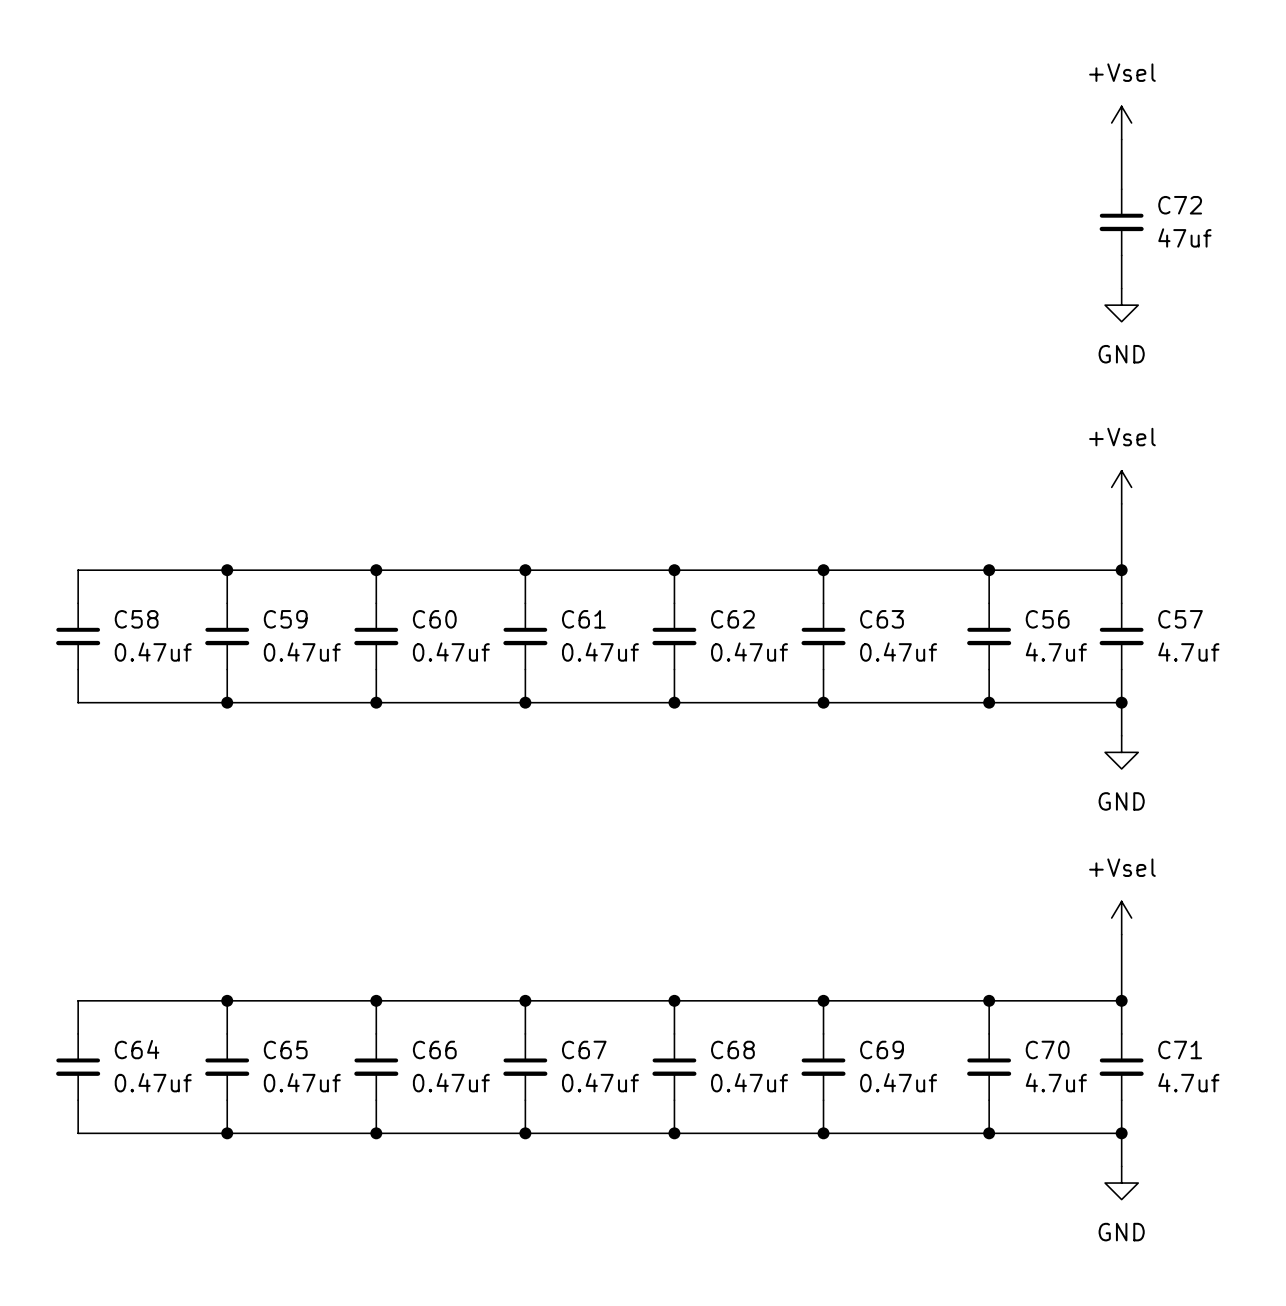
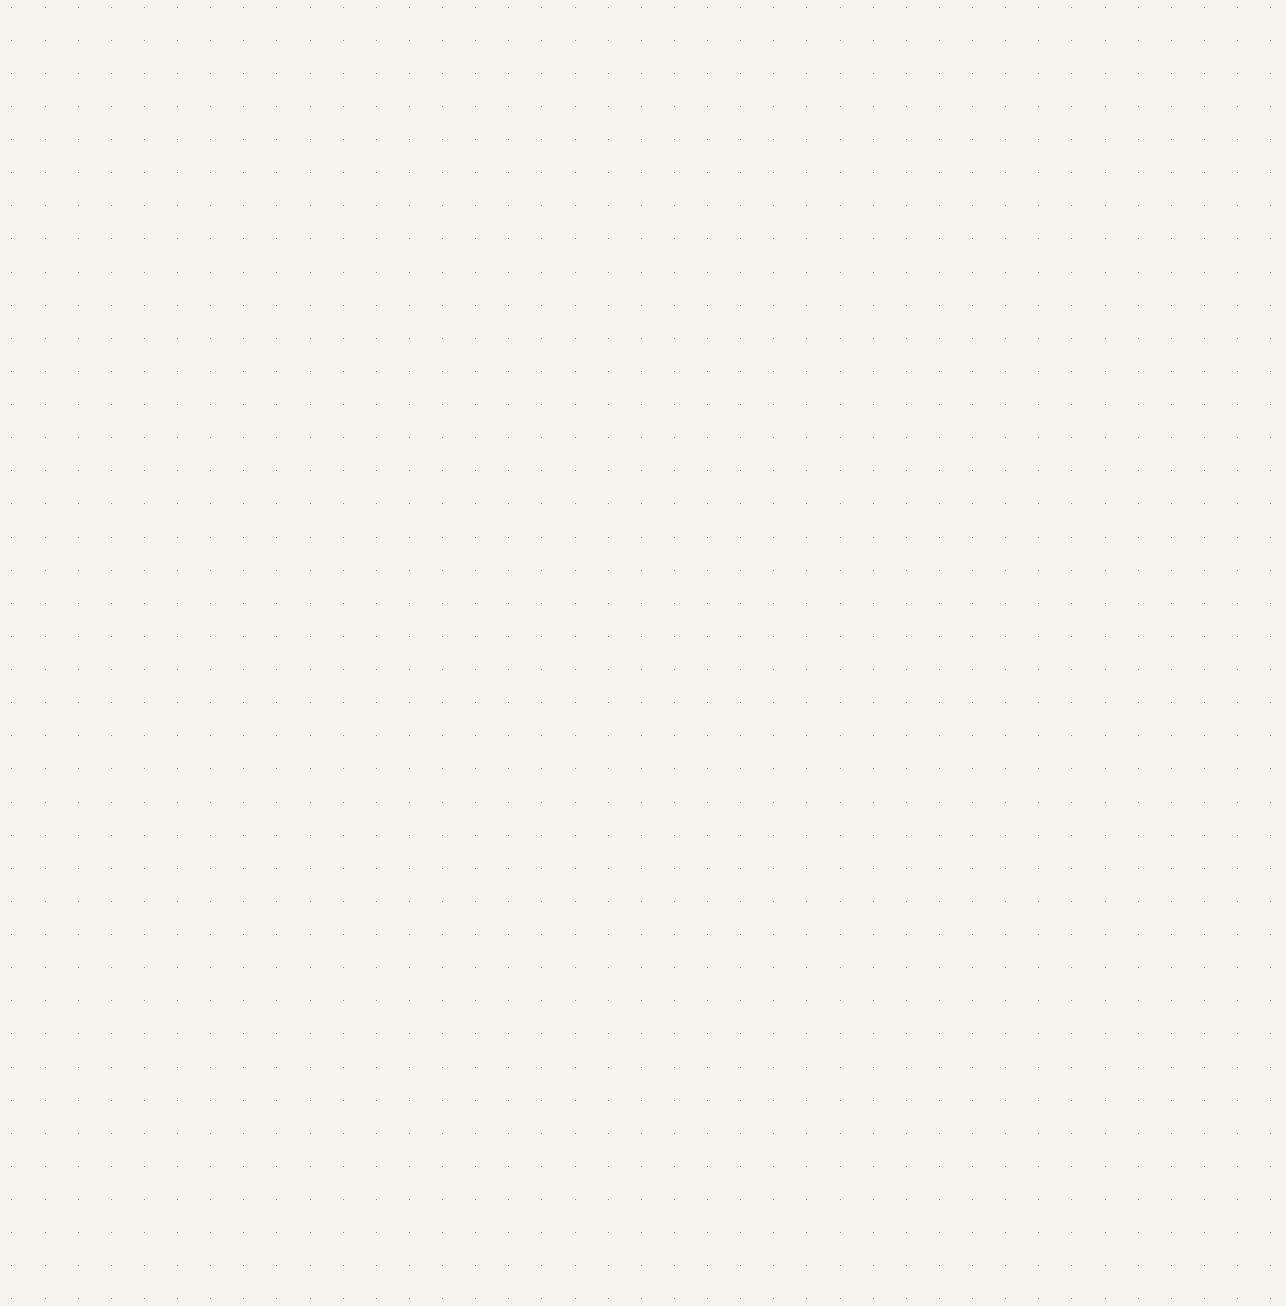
power symbol: +Vsel (1121, 122) -> none
wire: (1121, 139) (1121, 189) -> none
C72: 47uf (1121, 222) -> none
wire: (1121, 255) (1121, 288) -> none
power symbol: GND (1121, 305) -> none
power symbol: +Vsel (1121, 487) -> none
wire: (1121, 503) (1121, 603) -> none
wire: (227, 570) (227, 603) -> none
junction: (227, 570) -> none
wire: (376, 570) (376, 603) -> none
junction: (376, 570) -> none
wire: (525, 570) (525, 603) -> none
junction: (525, 570) -> none
wire: (674, 570) (674, 603) -> none
junction: (674, 570) -> none
wire: (823, 570) (823, 603) -> none
junction: (823, 570) -> none
wire: (989, 570) (989, 603) -> none
junction: (989, 570) -> none
wire: (1121, 570) (78, 570) (78, 603) -> none
junction: (1121, 570) -> none
C58: 0.47uf (78, 636) -> none
C59: 0.47uf (227, 636) -> none
C60: 0.47uf (376, 636) -> none
C61: 0.47uf (525, 636) -> none
C62: 0.47uf (674, 636) -> none
C63: 0.47uf (823, 636) -> none
C56: 4.7uf (989, 636) -> none
C57: 4.7uf (1121, 636) -> none
wire: (78, 669) (78, 702) (1121, 702) -> none
wire: (227, 669) (227, 702) -> none
wire: (376, 669) (376, 702) -> none
wire: (525, 669) (525, 702) -> none
wire: (674, 669) (674, 702) -> none
wire: (823, 669) (823, 702) -> none
wire: (989, 669) (989, 702) -> none
wire: (1121, 669) (1121, 735) -> none
junction: (227, 702) -> none
junction: (376, 702) -> none
junction: (525, 702) -> none
junction: (674, 702) -> none
junction: (823, 702) -> none
junction: (989, 702) -> none
junction: (1121, 702) -> none
power symbol: GND (1121, 752) -> none
power symbol: +Vsel (1121, 918) -> none
wire: (1121, 934) (1121, 1033) -> none
wire: (227, 1000) (227, 1033) -> none
junction: (227, 1000) -> none
wire: (376, 1000) (376, 1033) -> none
junction: (376, 1000) -> none
wire: (525, 1000) (525, 1033) -> none
junction: (525, 1000) -> none
wire: (674, 1000) (674, 1033) -> none
junction: (674, 1000) -> none
wire: (823, 1000) (823, 1033) -> none
junction: (823, 1000) -> none
wire: (989, 1000) (989, 1033) -> none
junction: (989, 1000) -> none
wire: (1121, 1000) (78, 1000) (78, 1033) -> none
junction: (1121, 1000) -> none
C64: 0.47uf (78, 1067) -> none
C65: 0.47uf (227, 1067) -> none
C66: 0.47uf (376, 1067) -> none
C67: 0.47uf (525, 1067) -> none
C68: 0.47uf (674, 1067) -> none
C69: 0.47uf (823, 1067) -> none
C70: 4.7uf (989, 1067) -> none
C71: 4.7uf (1121, 1067) -> none
wire: (78, 1100) (78, 1133) (1121, 1133) -> none
wire: (227, 1100) (227, 1133) -> none
wire: (376, 1100) (376, 1133) -> none
wire: (525, 1100) (525, 1133) -> none
wire: (674, 1100) (674, 1133) -> none
wire: (823, 1100) (823, 1133) -> none
wire: (989, 1100) (989, 1133) -> none
wire: (1121, 1100) (1121, 1166) -> none
junction: (227, 1133) -> none
junction: (376, 1133) -> none
junction: (525, 1133) -> none
junction: (674, 1133) -> none
junction: (823, 1133) -> none
junction: (989, 1133) -> none
junction: (1121, 1133) -> none
power symbol: GND (1121, 1183) -> none

